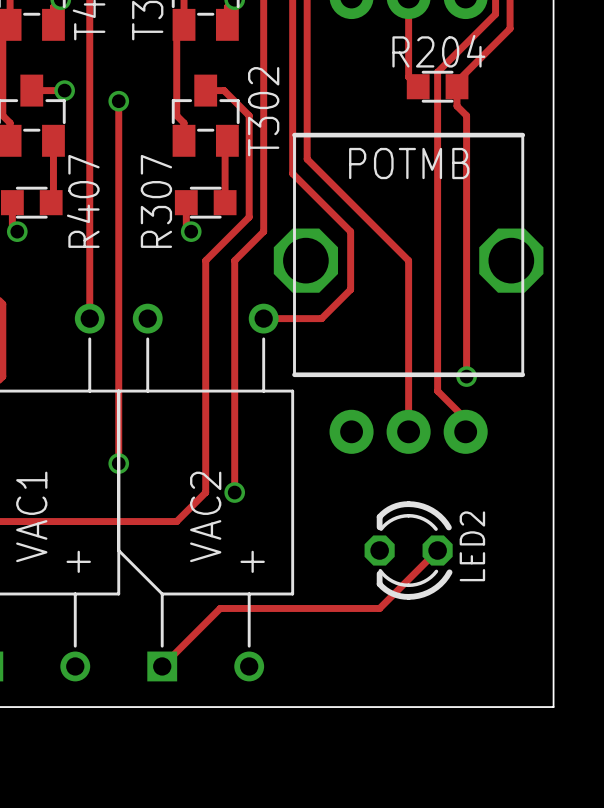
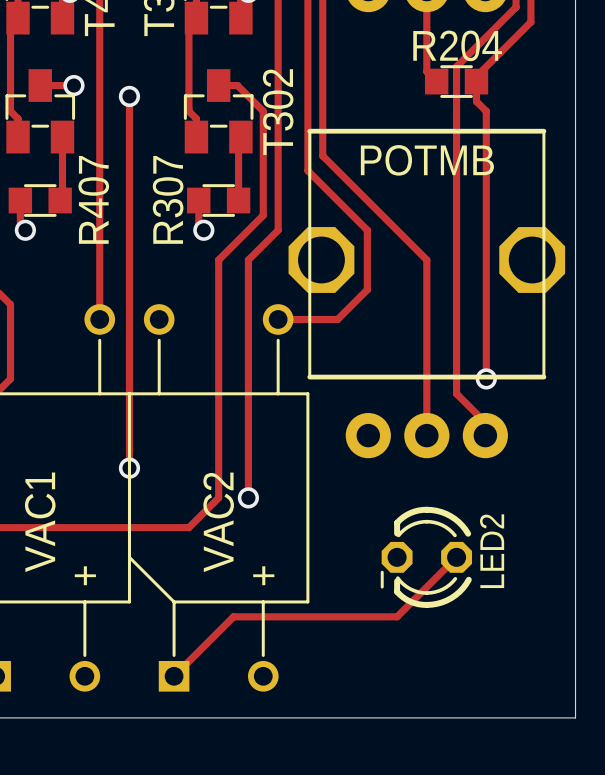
LED2 footprint: [364, 501, 453, 600] -> [380, 506, 473, 608]

